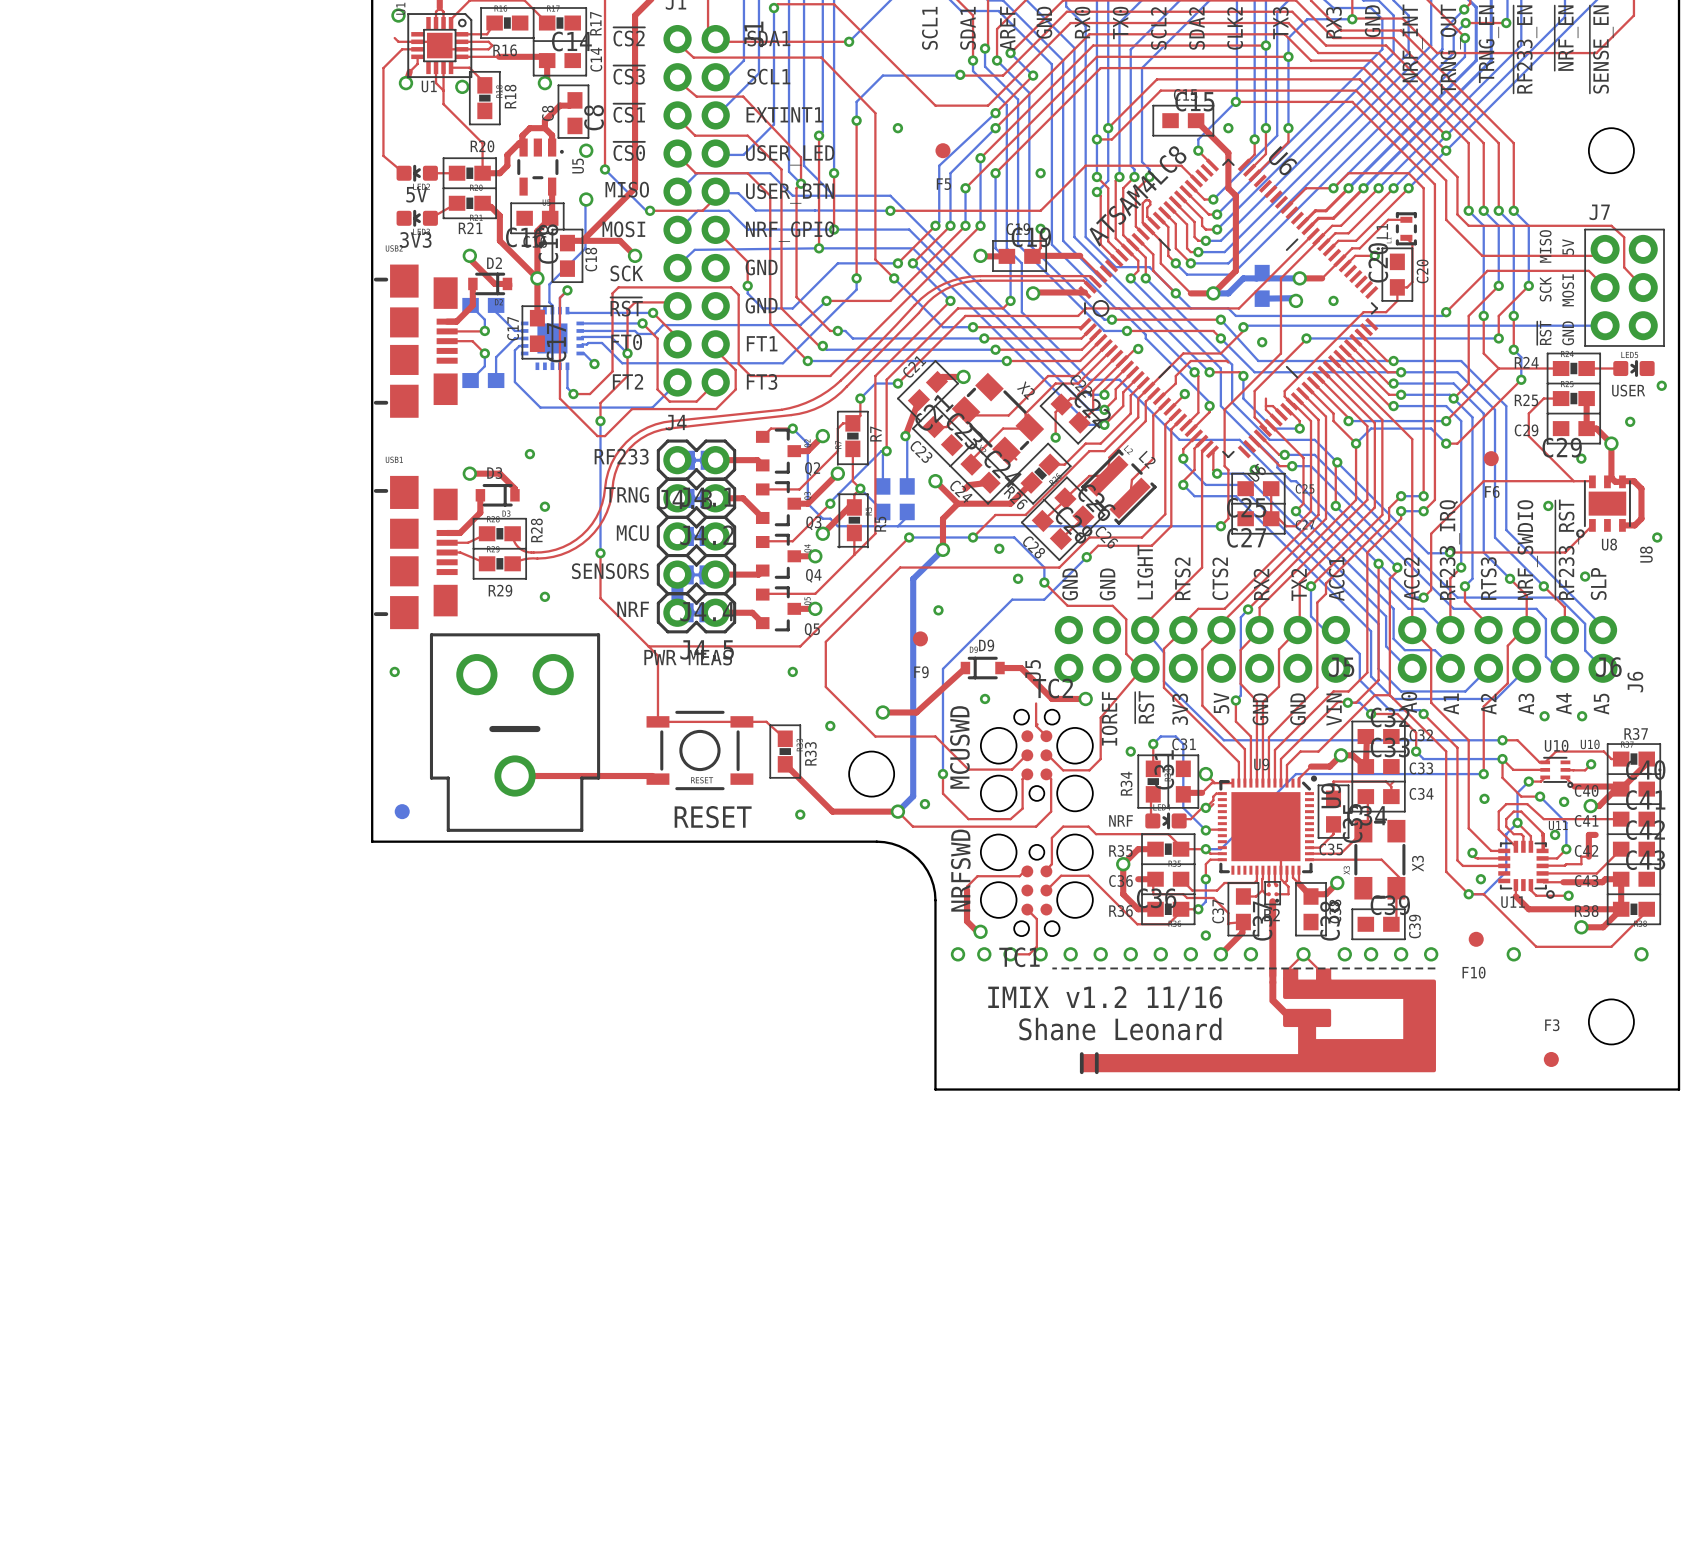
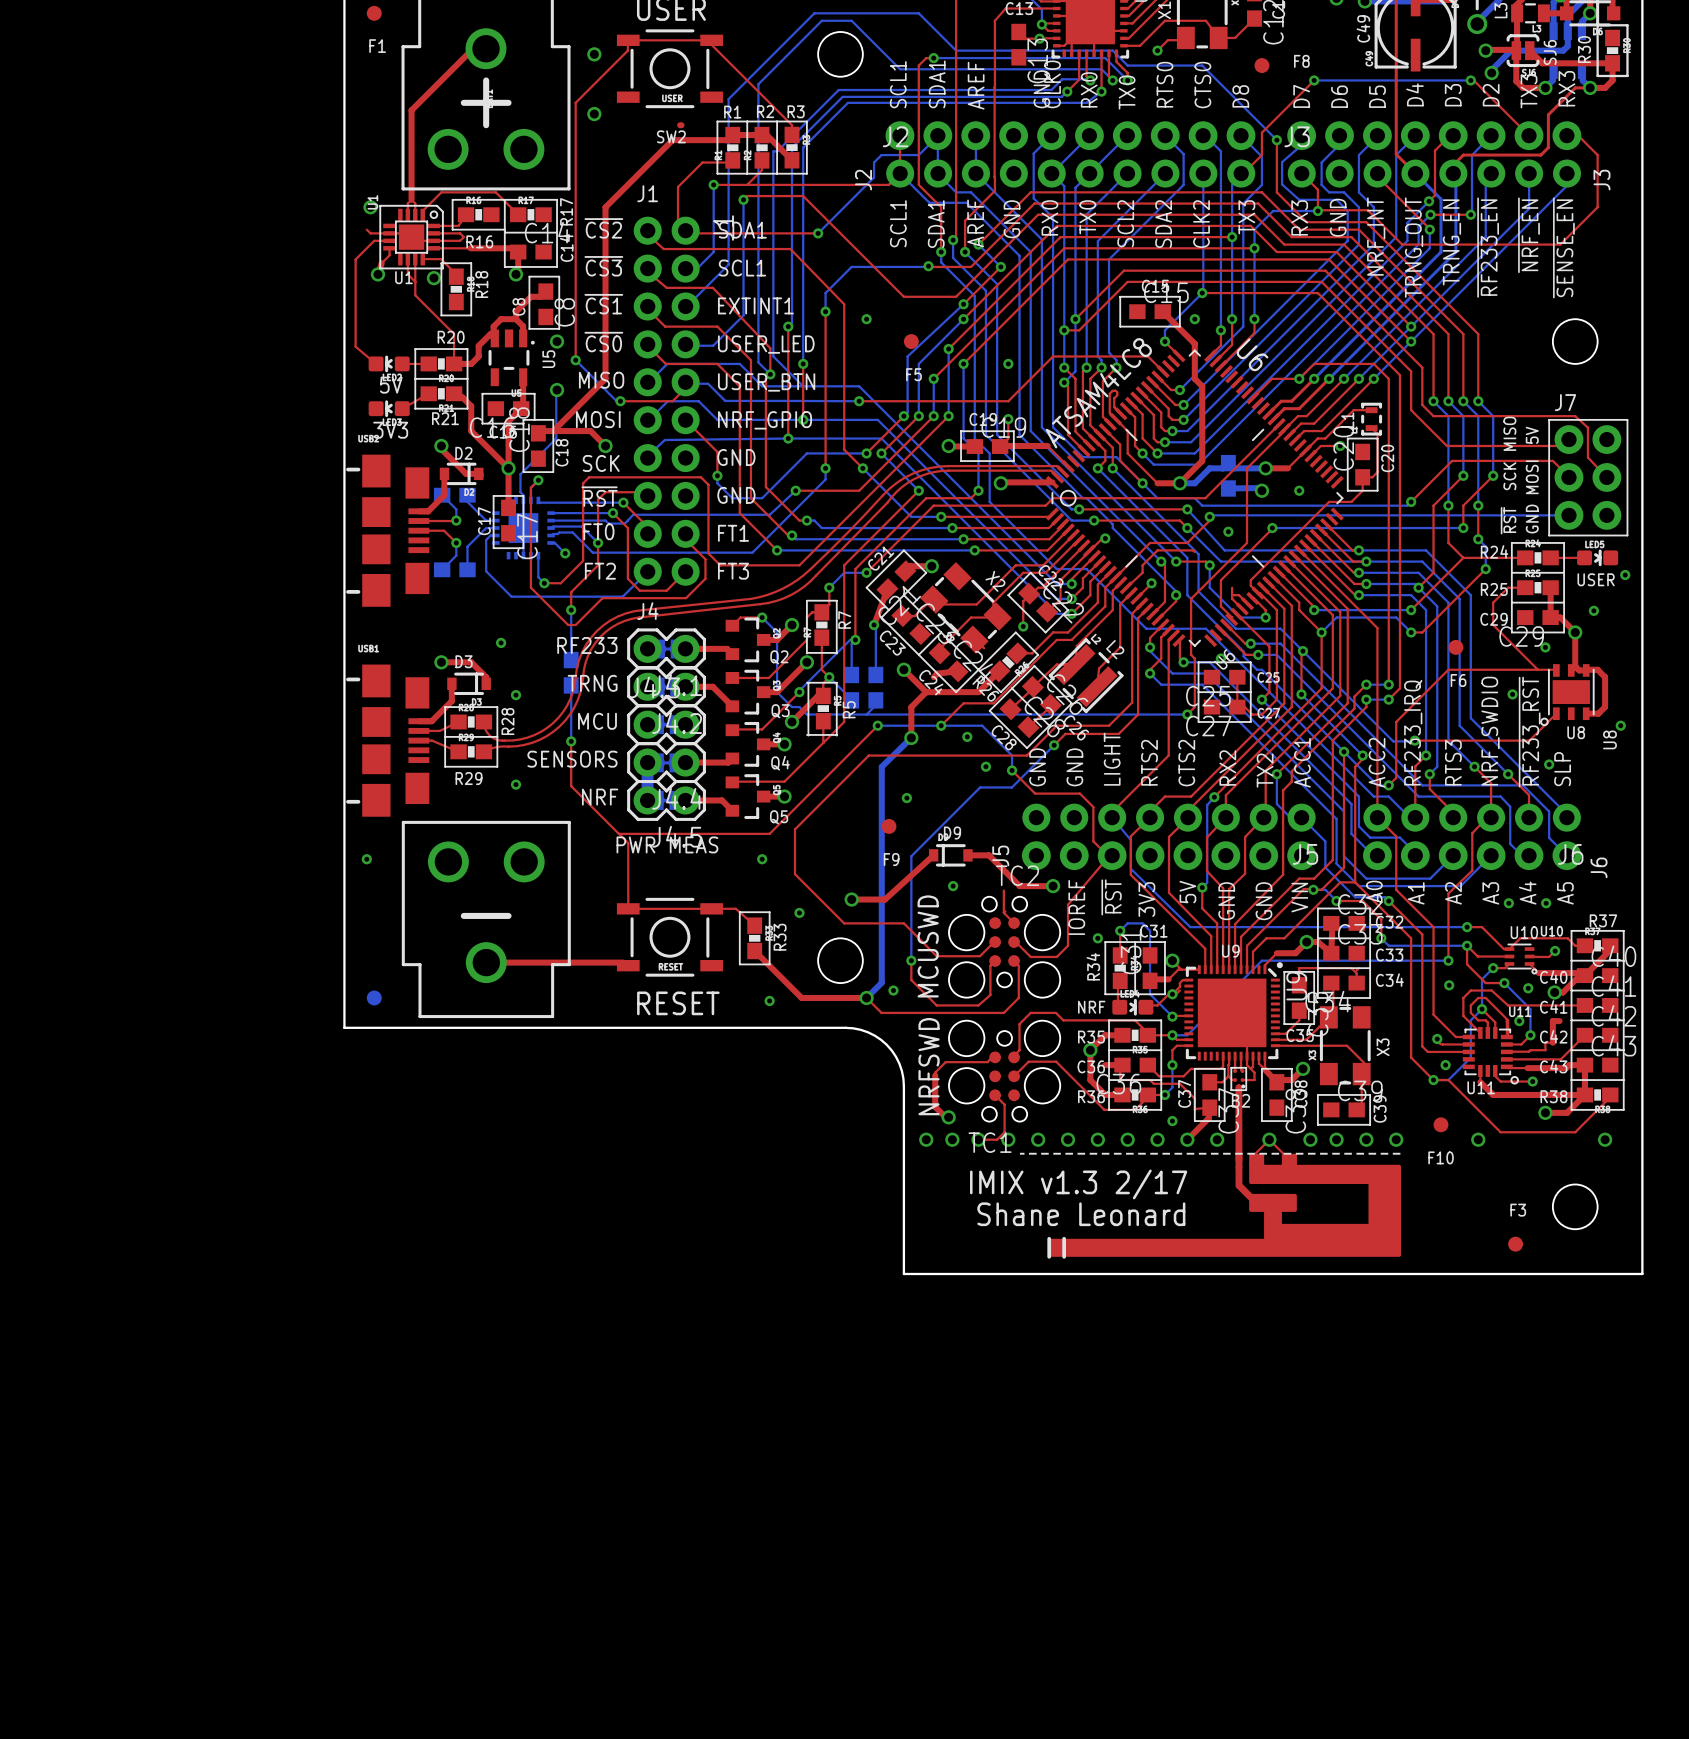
bottom track: (600, 471) (600, 496) -> none
part: none -> (571, 672)
text: IMIX v1.2 11/16 (1105, 998) -> IMIX v1.3 2/17 (1078, 1184)

